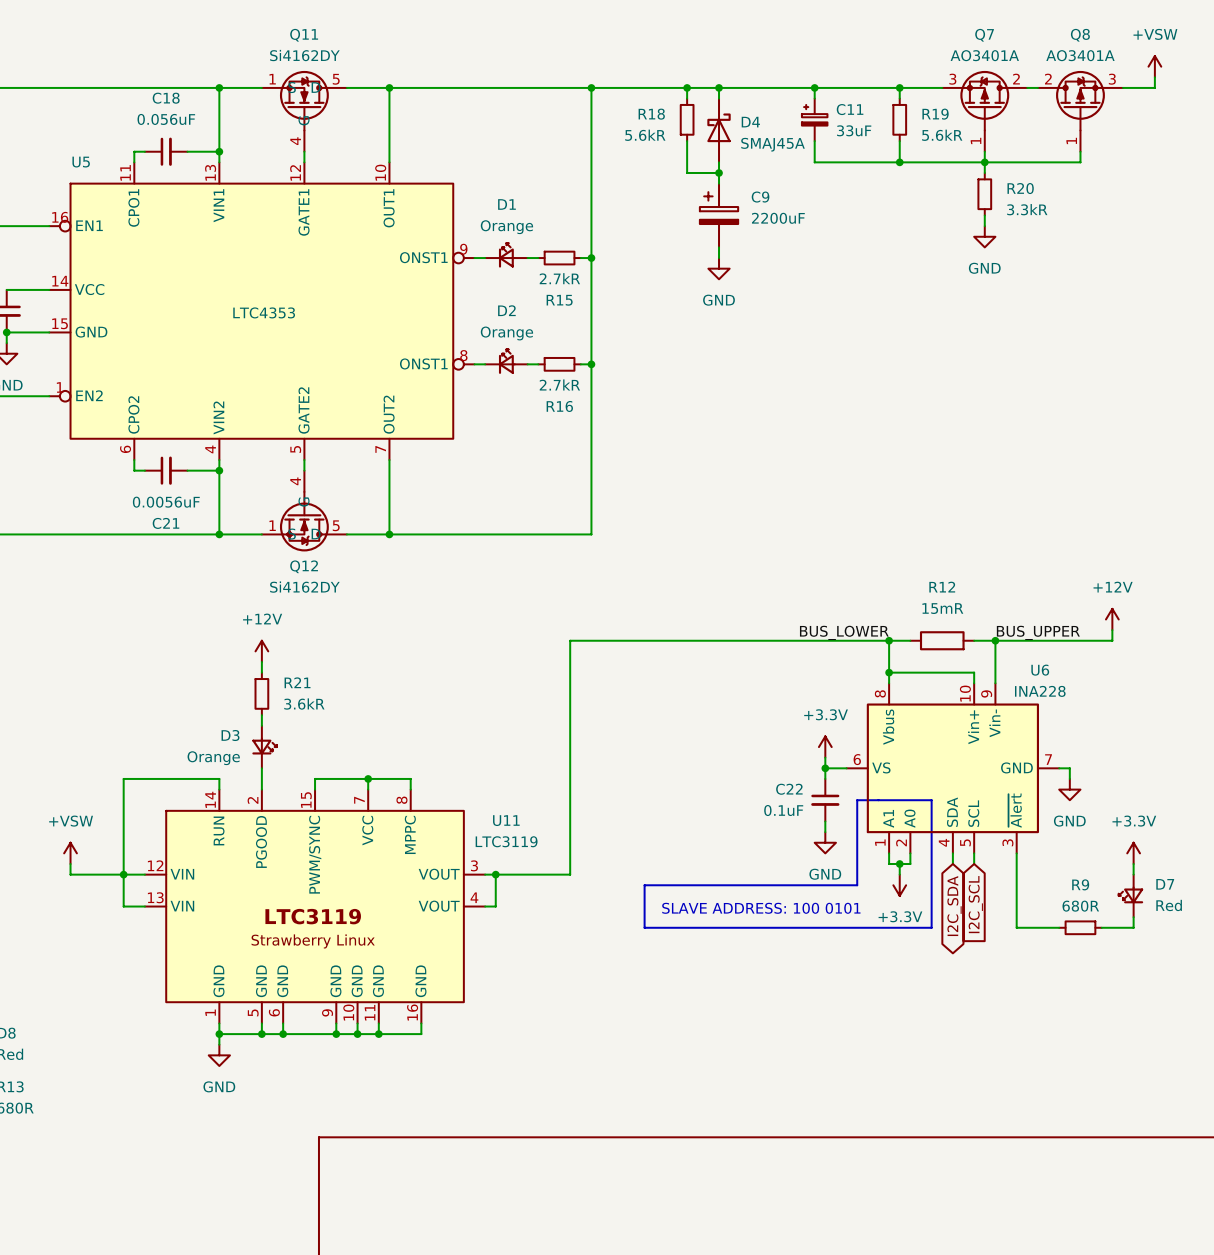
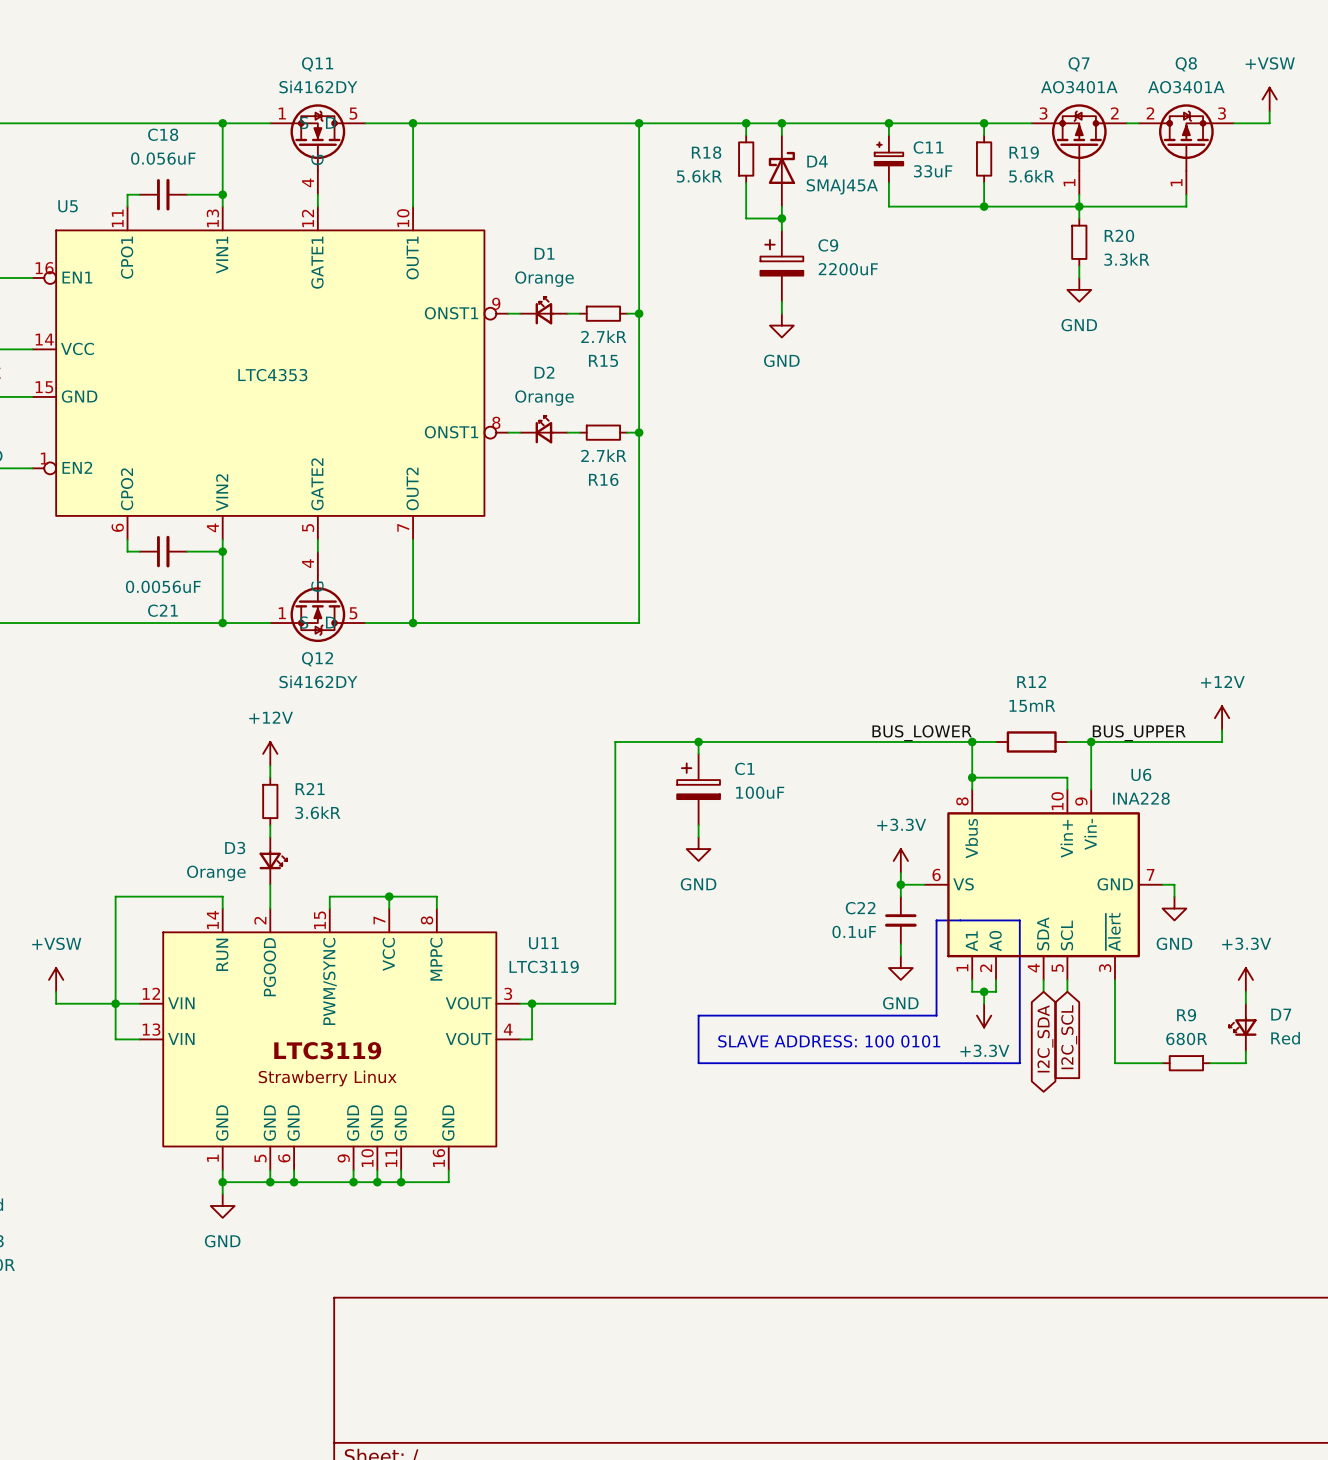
wire: none -> (698, 741) (698, 753)
junction: none -> (698, 741)
C1: none -> 100uF (698, 789)
wire: none -> (698, 825) (698, 837)
power symbol: none -> GND (698, 849)

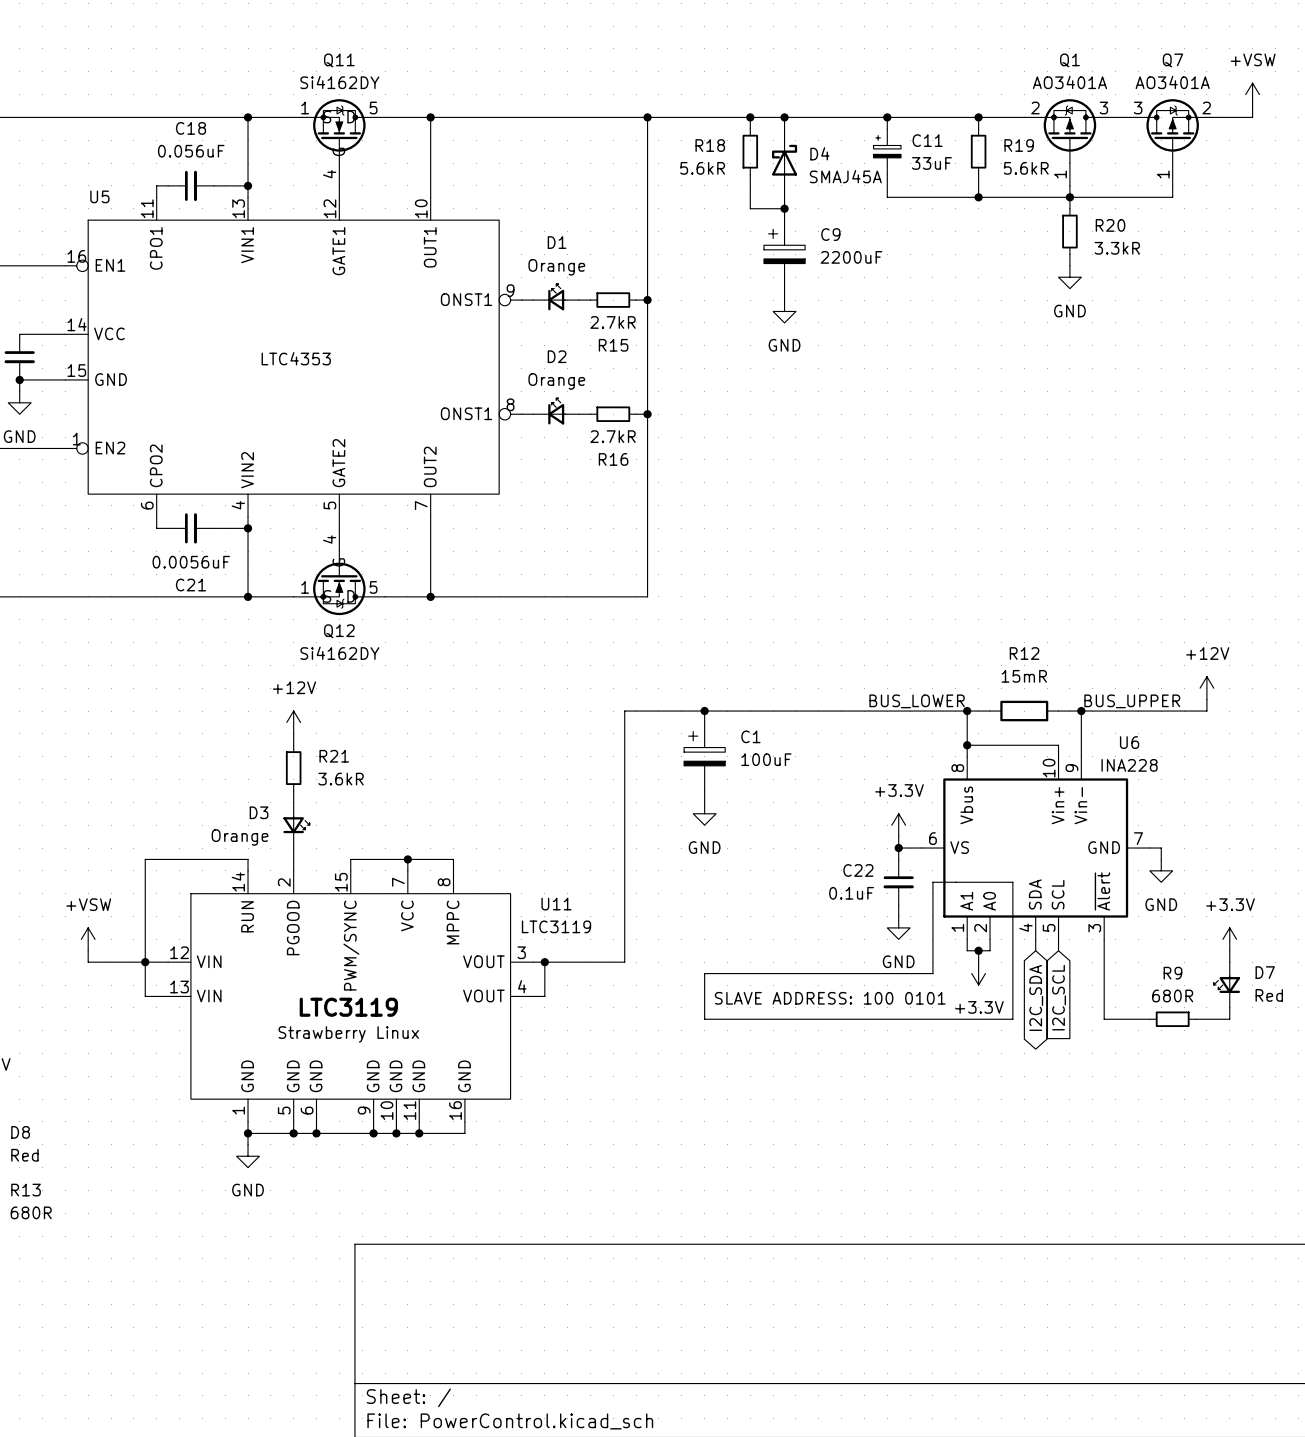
Q7 symbol: [1031, 104, 1127, 195] -> [1127, 99, 1219, 186]
Q1: none -> AO3401A (1069, 142)
Q8: AO3401A (1186, 149) -> none

